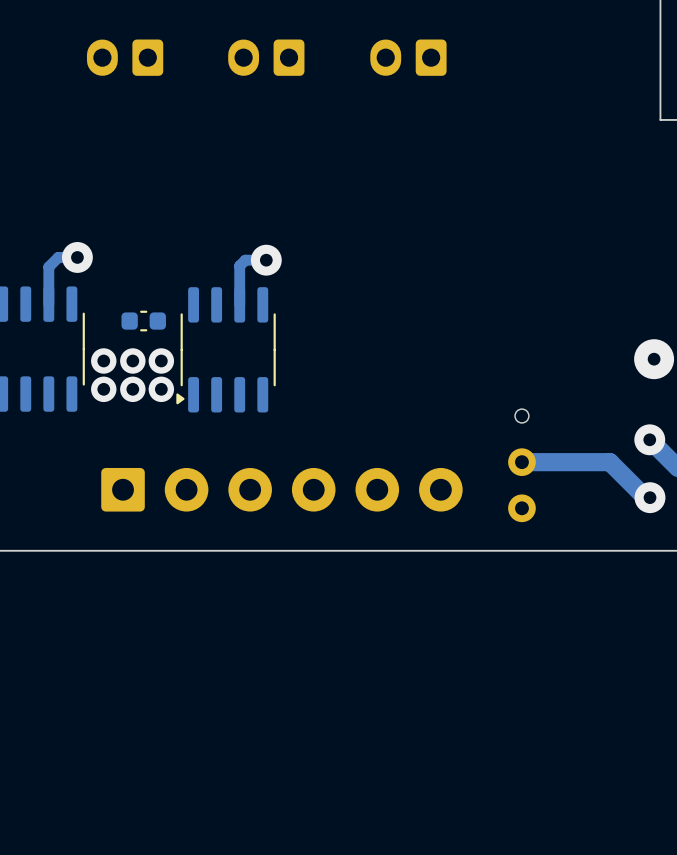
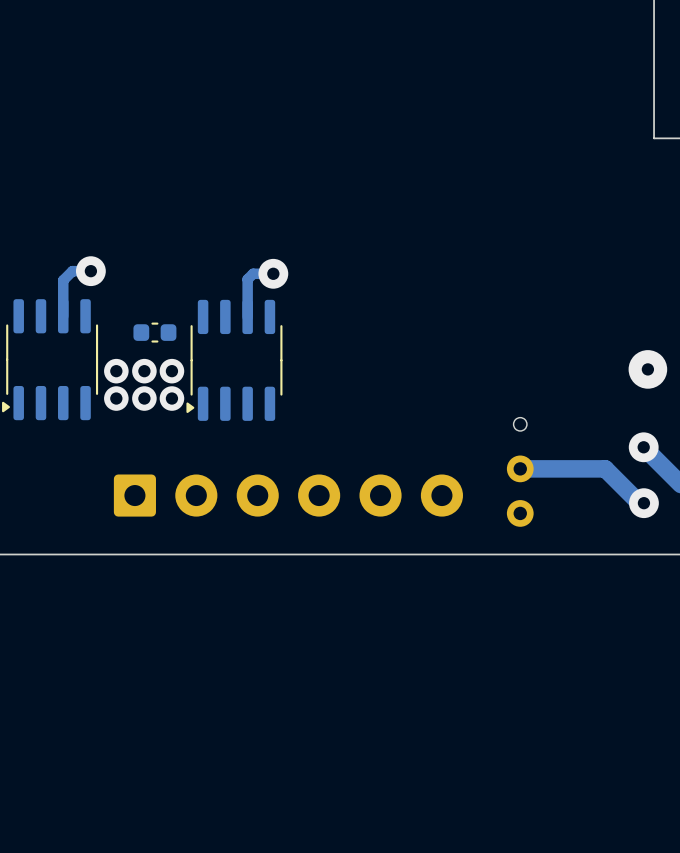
part: (125, 57) -> none
part: (266, 57) -> none
part: (408, 57) -> none

